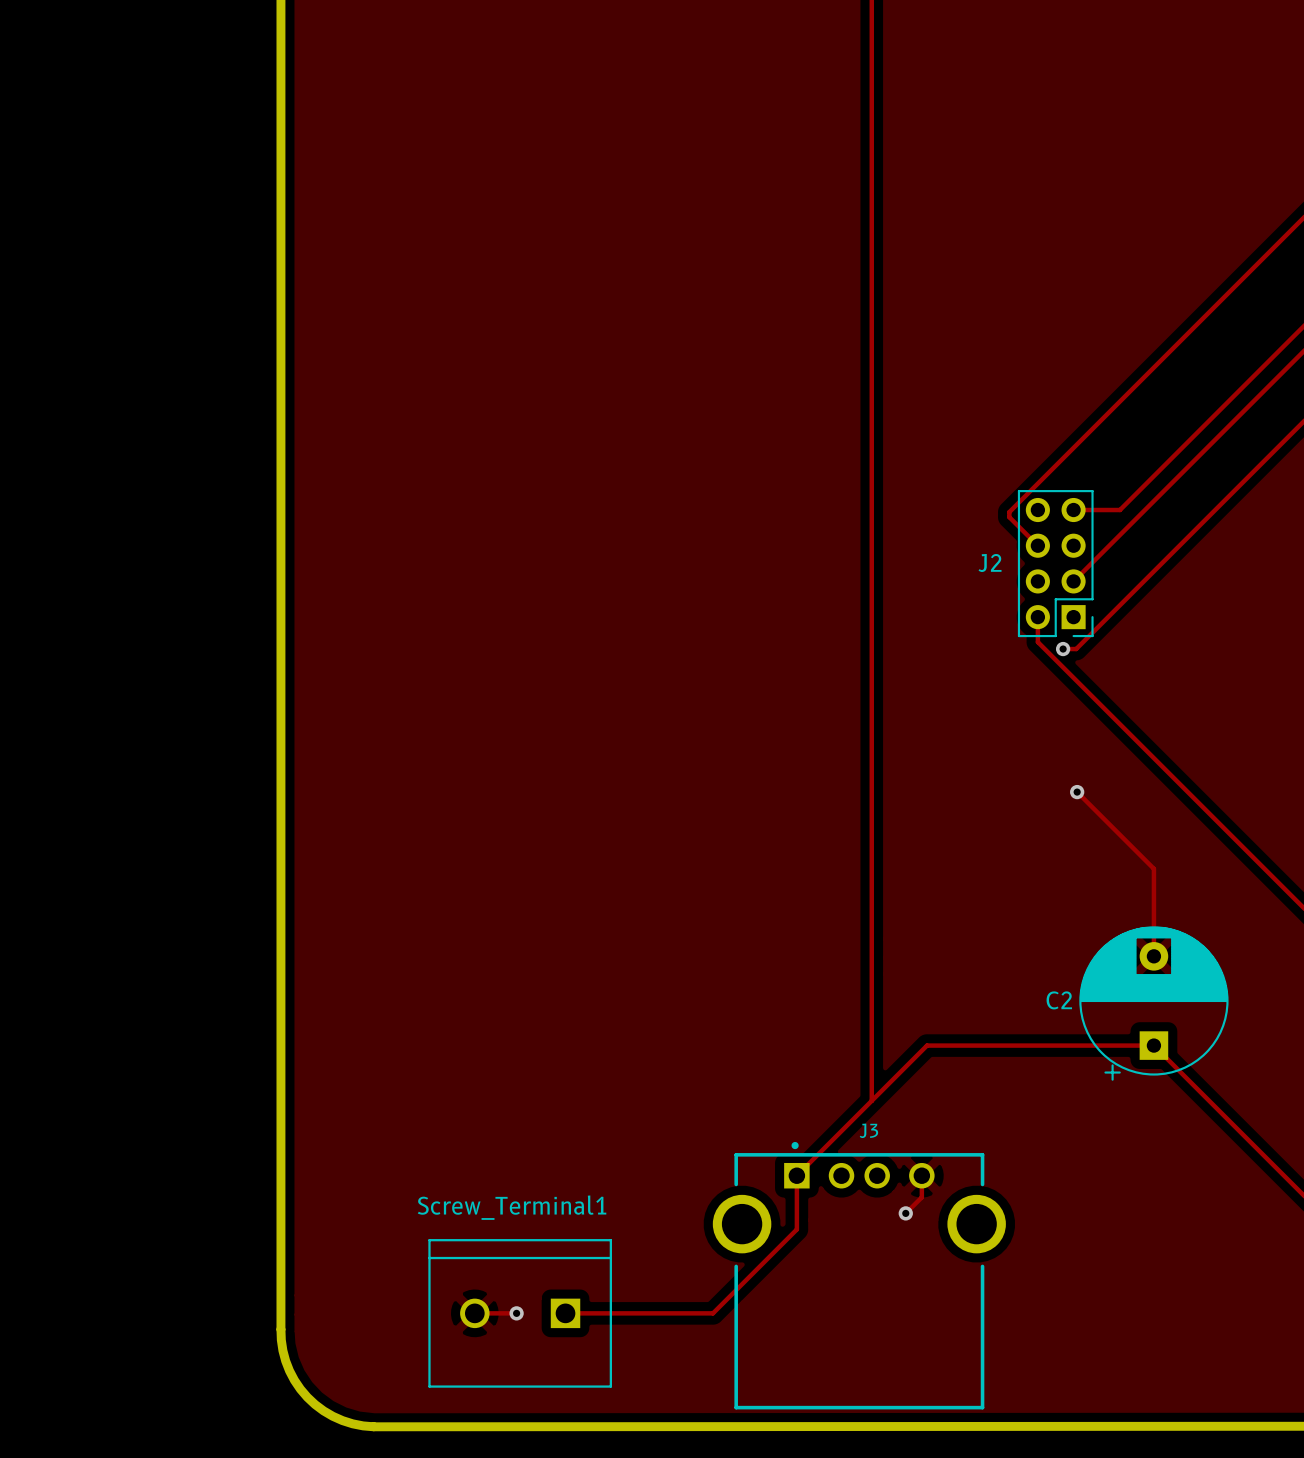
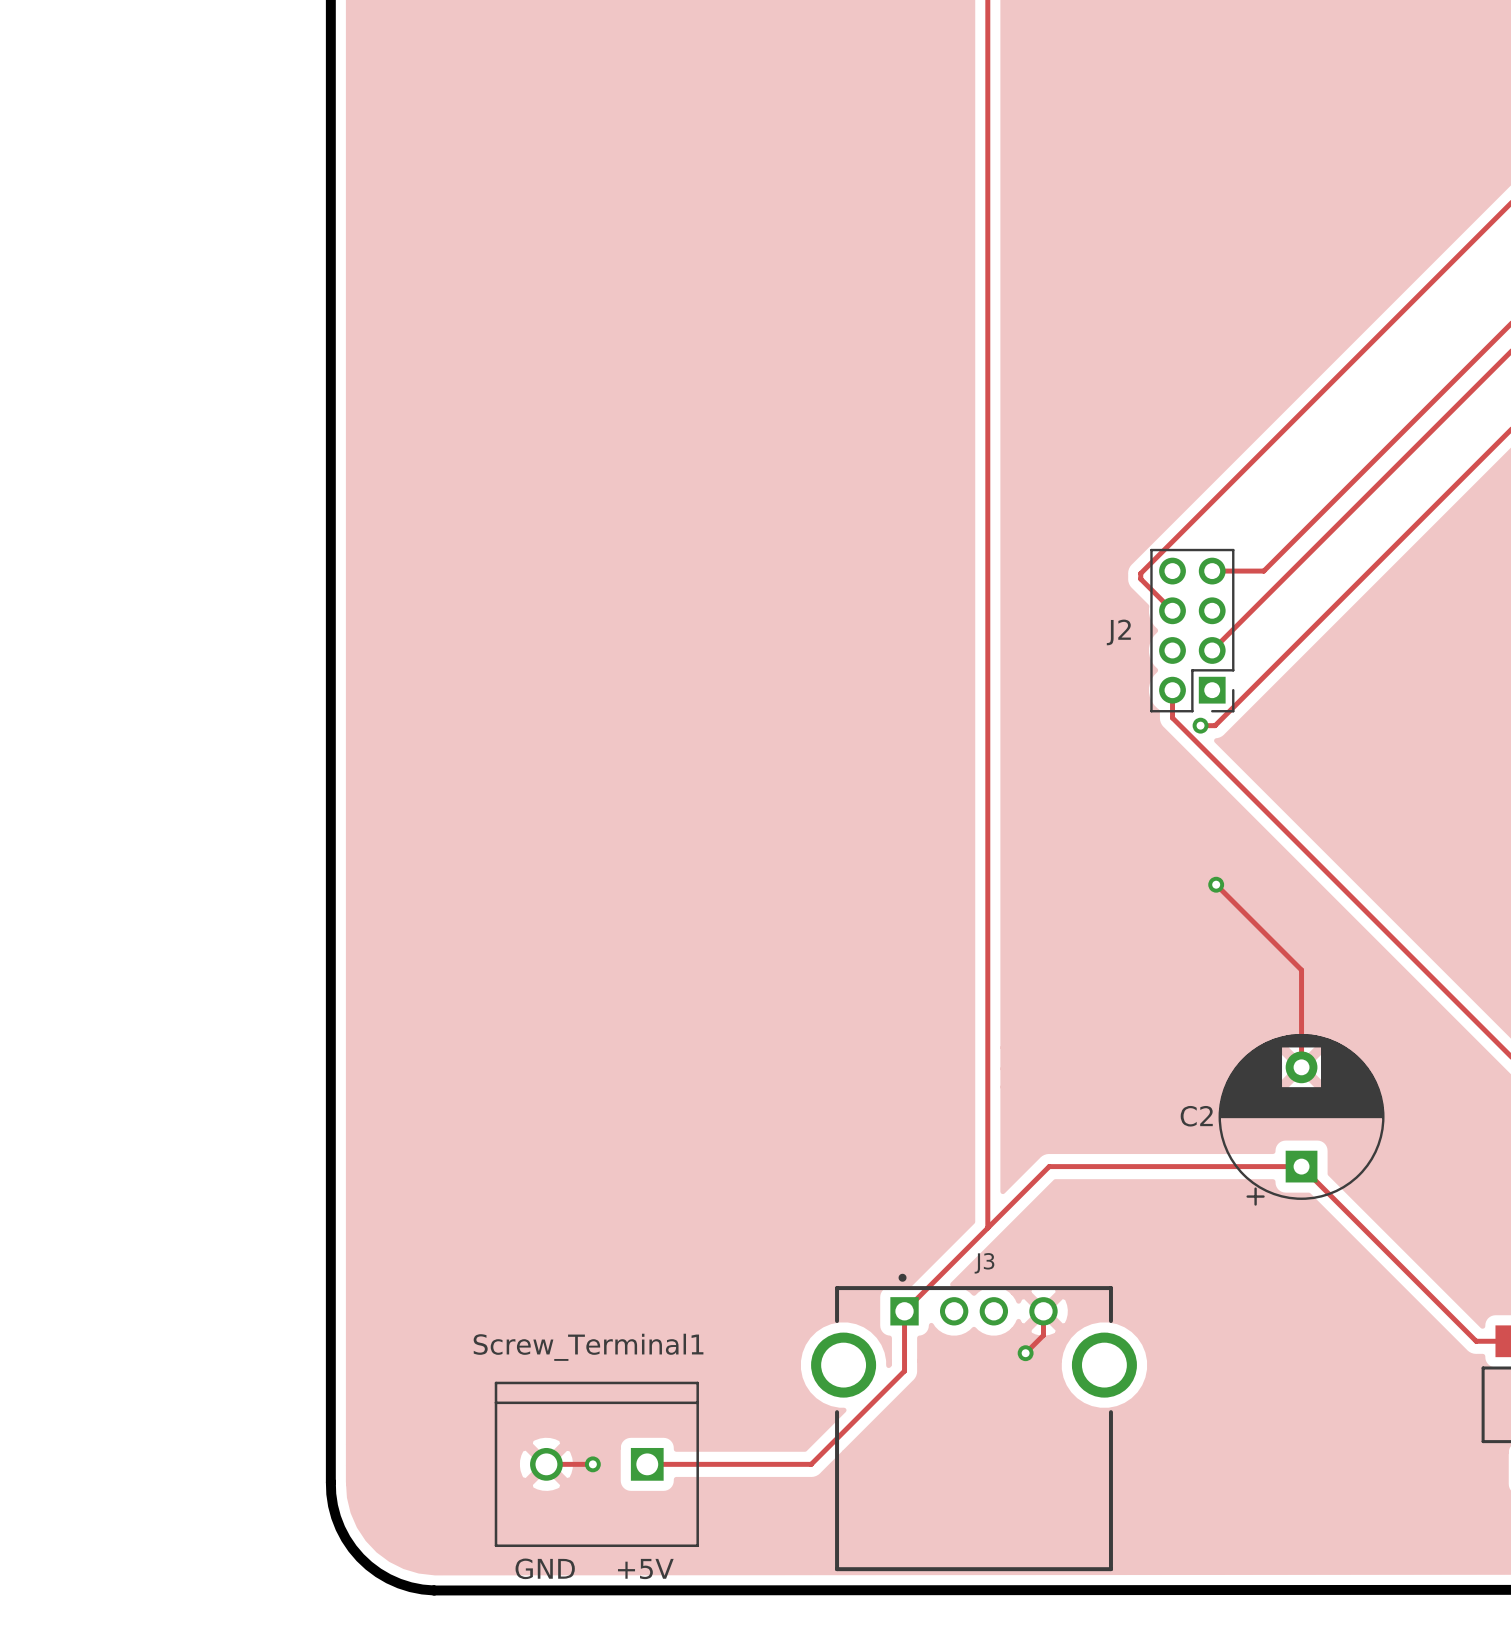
text: none -> GND (545, 1568)
text: none -> +5V (645, 1569)

